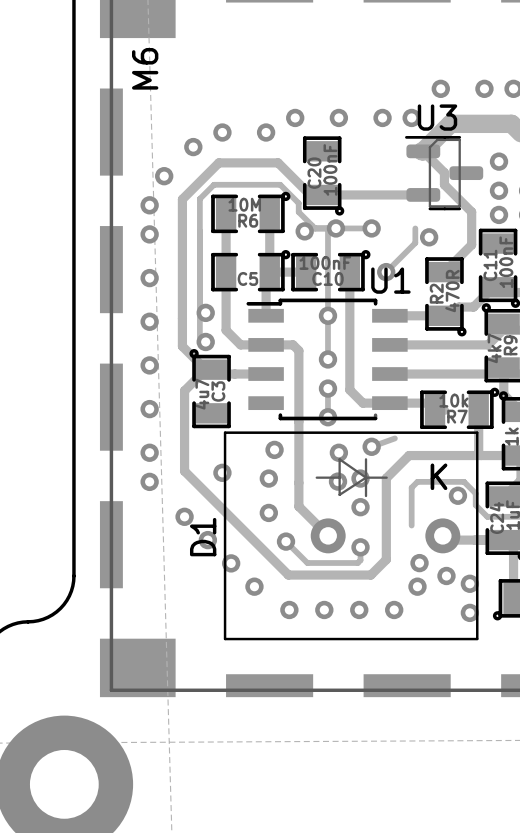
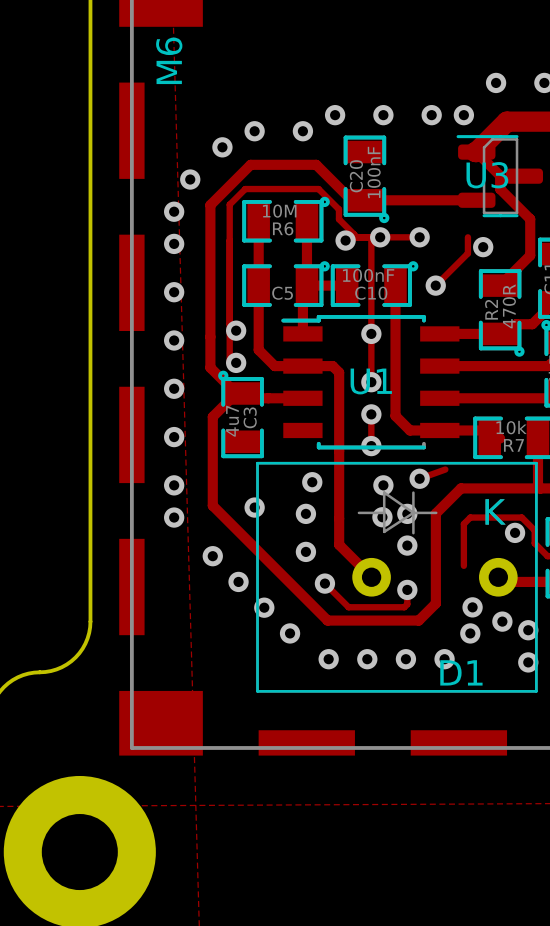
U3 name position: U3 (437, 117) -> U3 (487, 175)
U1 name position: U1 (390, 280) -> U1 (371, 381)
D1 name rotation: 0° (203, 537) -> 90° clockwise (461, 672)
D1 name position: D1 (203, 537) -> D1 (461, 672)

